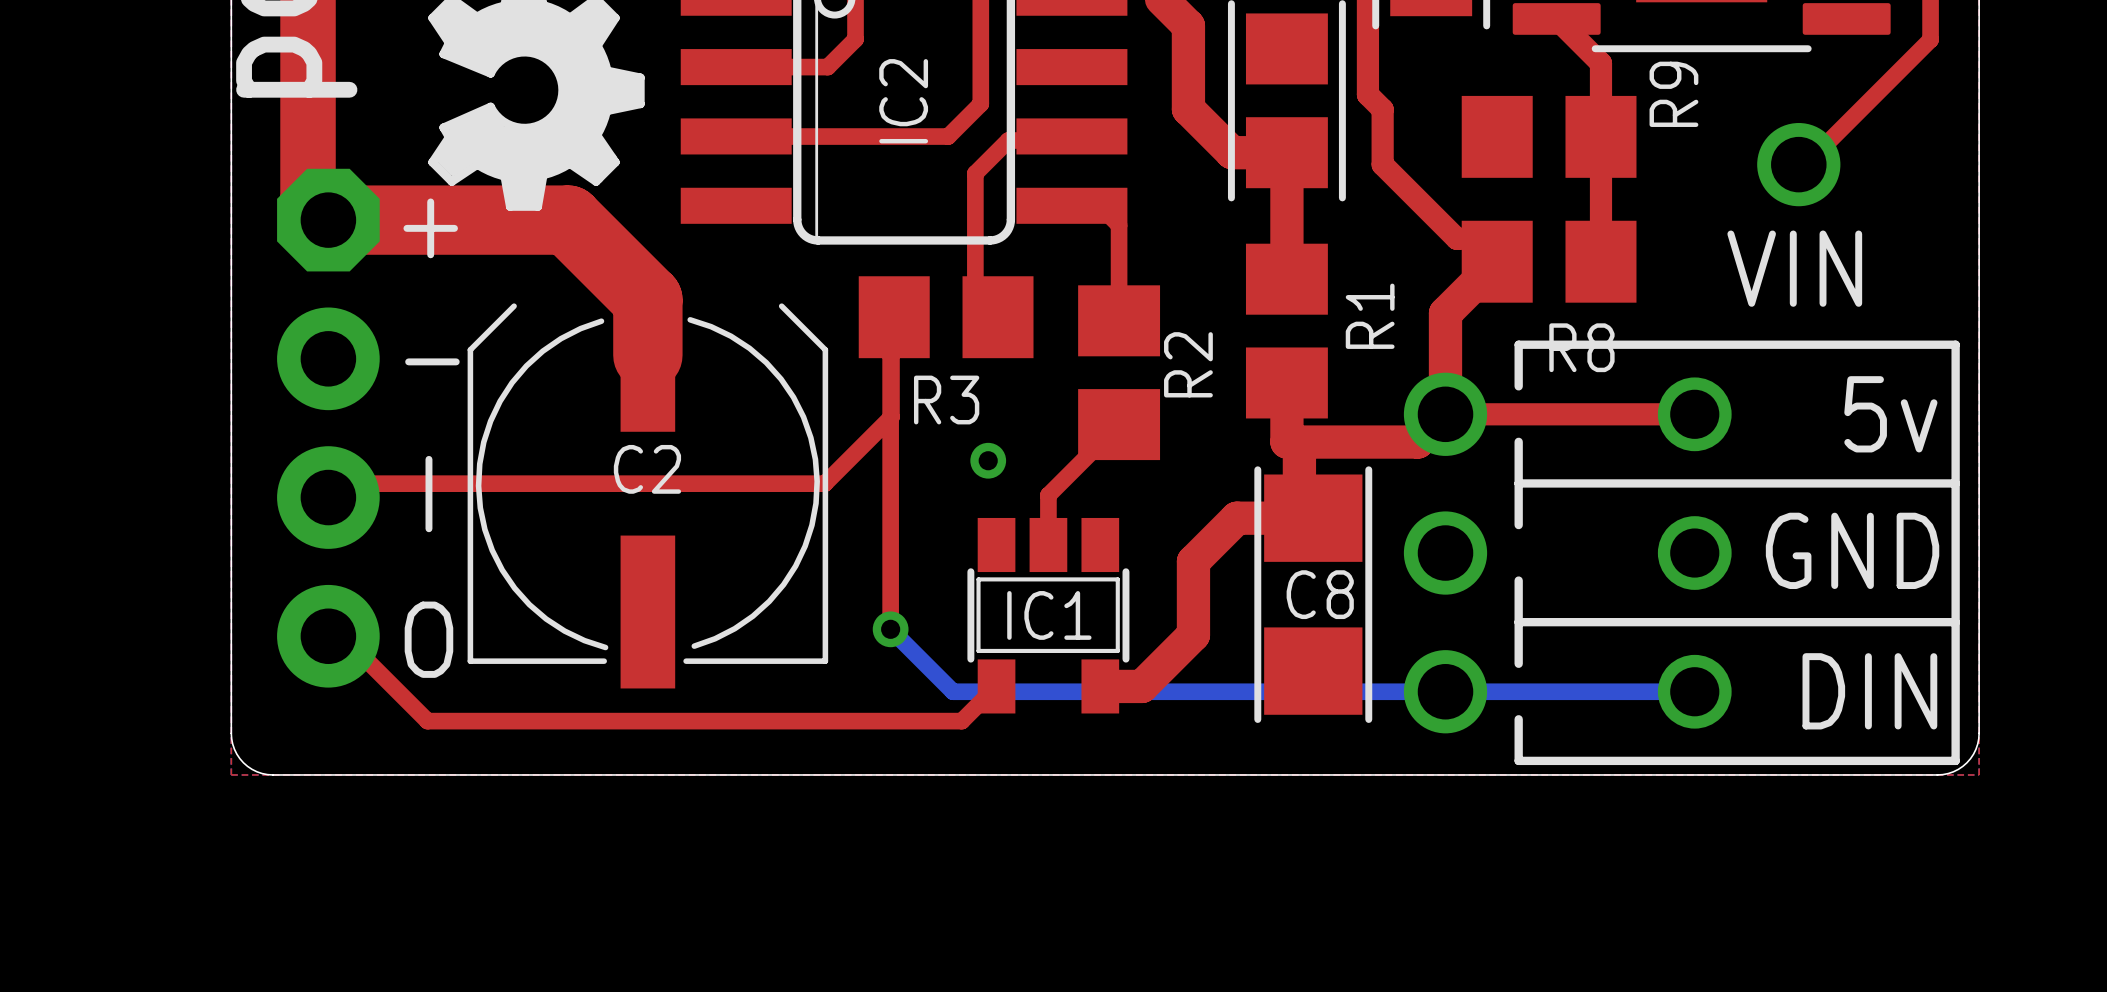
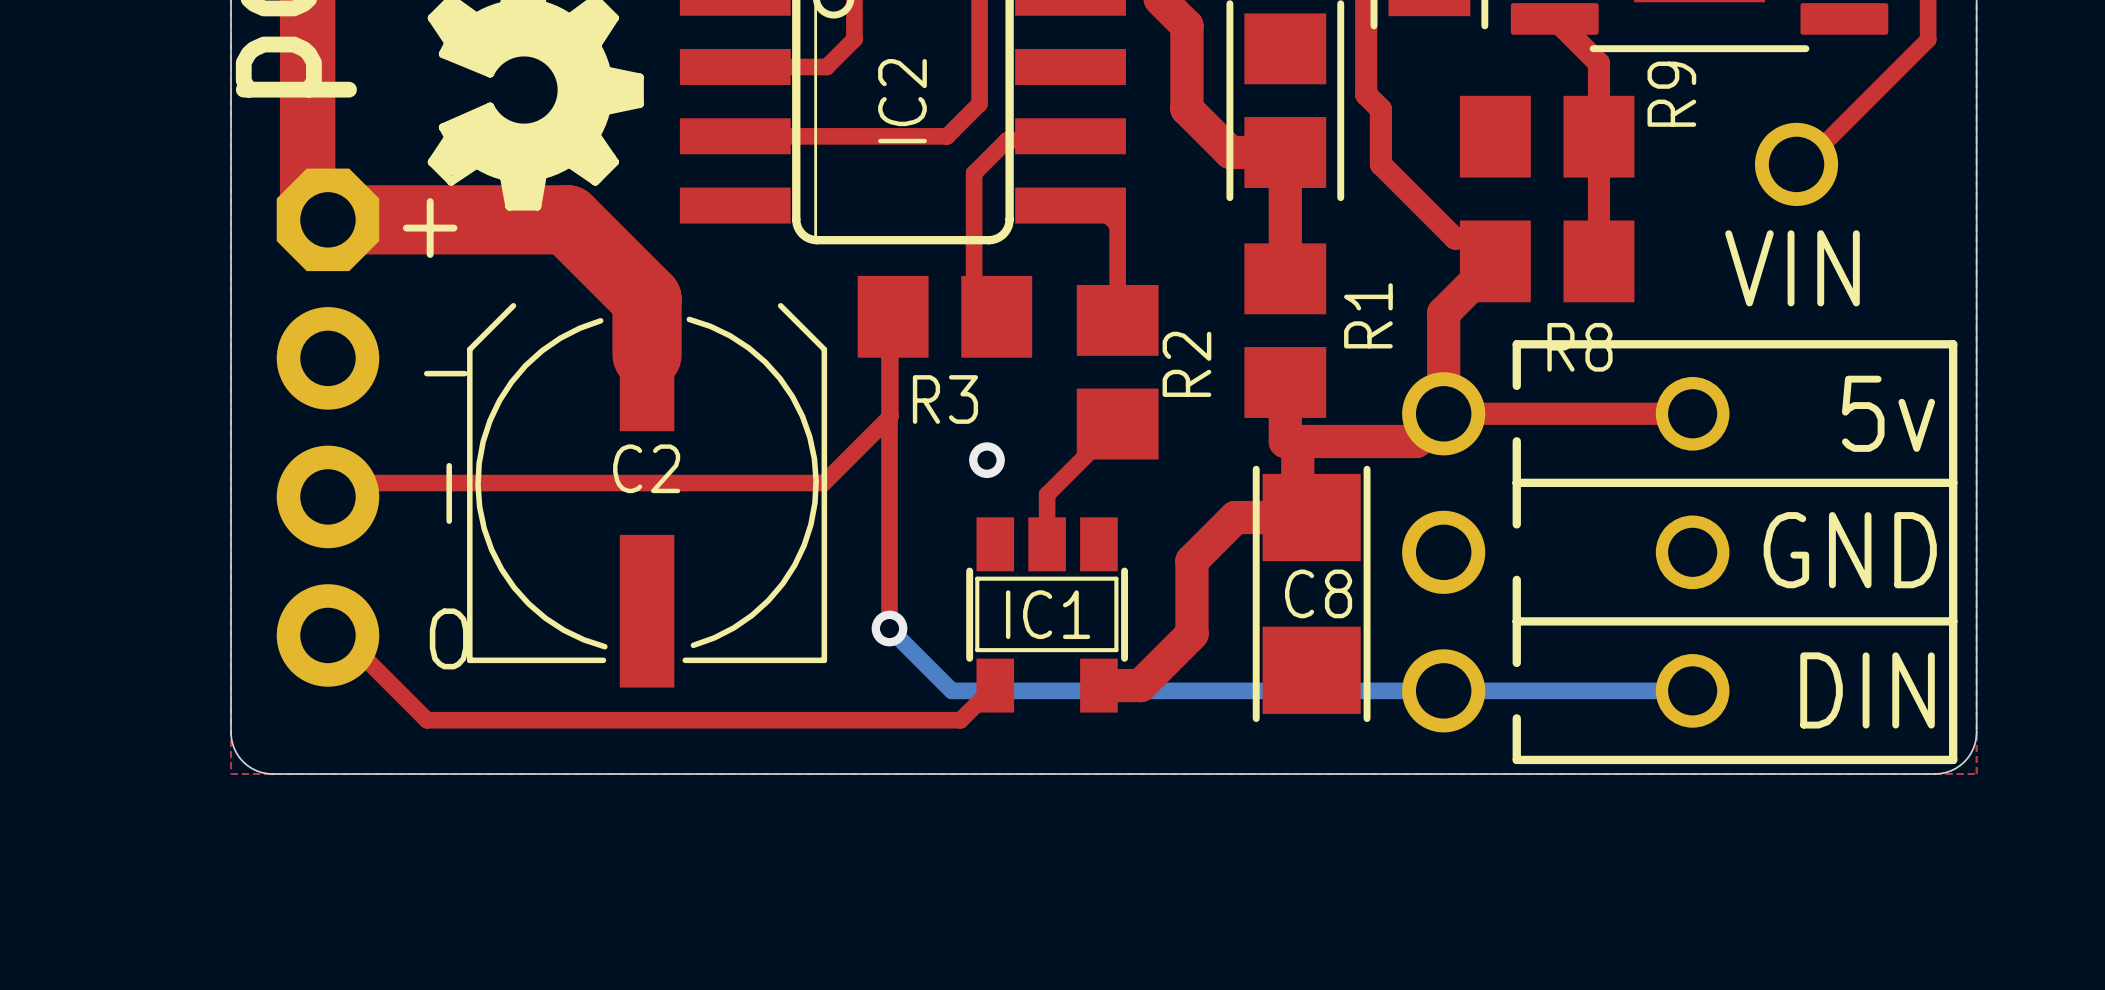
text position: - (432, 361) -> - (445, 373)
text position: I (428, 494) -> I (449, 493)
text position: O (428, 639) -> O (449, 638)

